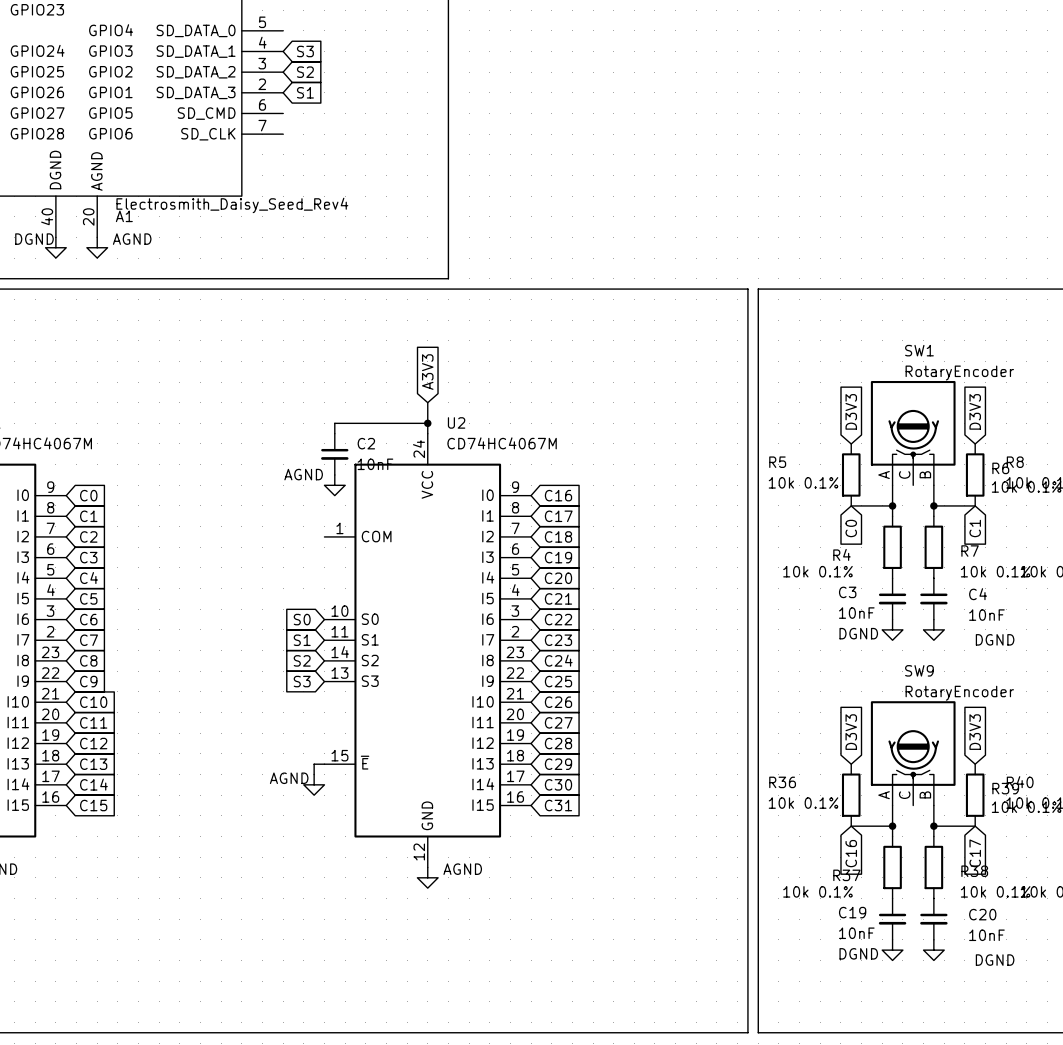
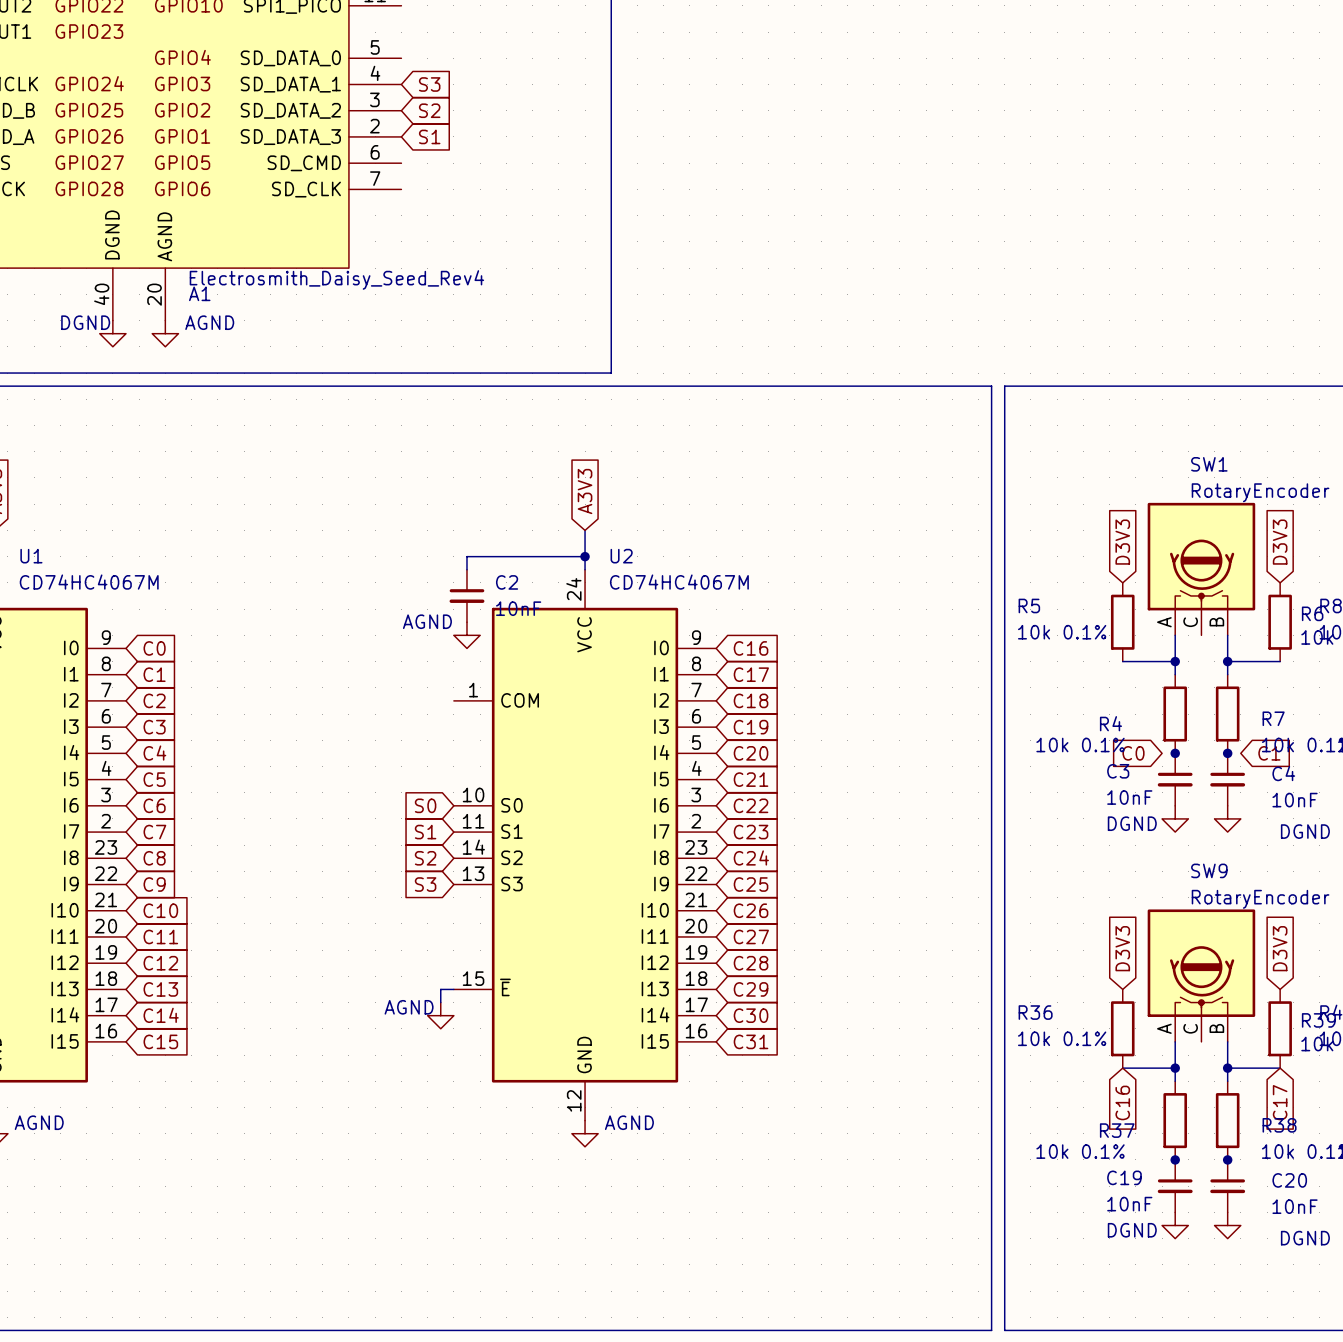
global label rotation: 0° (851, 528) -> 90° clockwise (1133, 753)
global label rotation: 0° (975, 528) -> 90° counterclockwise (1269, 753)
junction: none -> (1175, 753)
junction: none -> (1227, 753)
junction: none -> (1175, 1159)
junction: none -> (1227, 1159)

